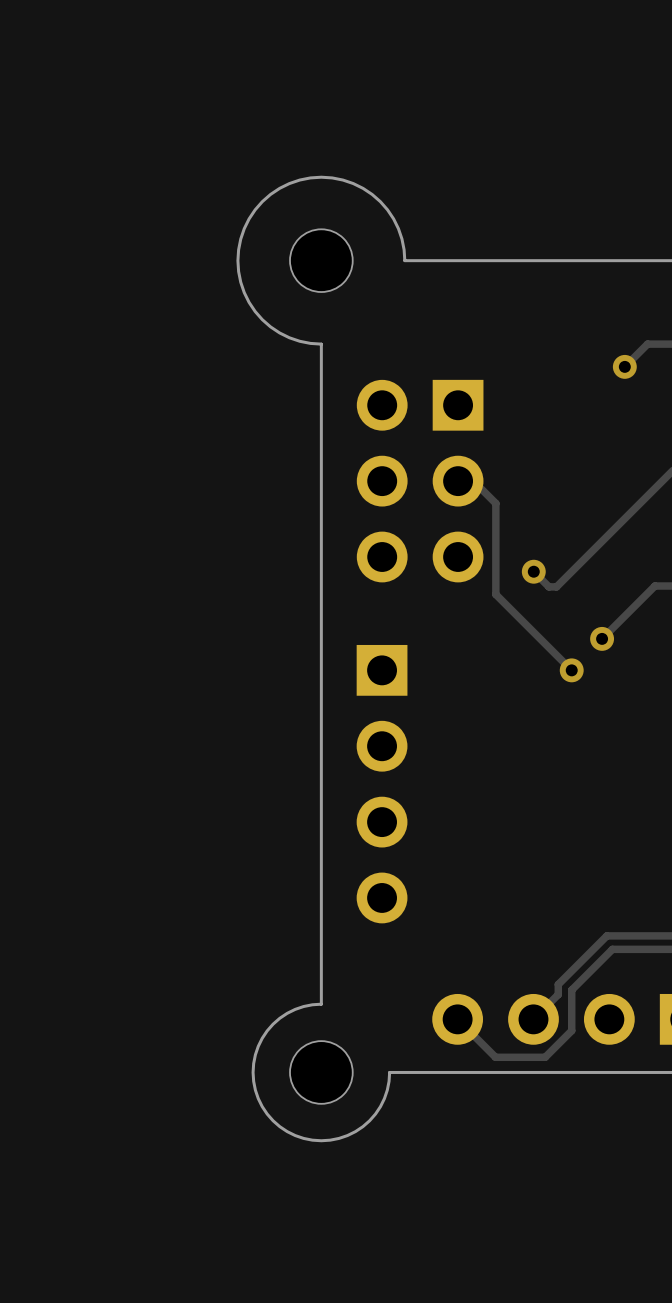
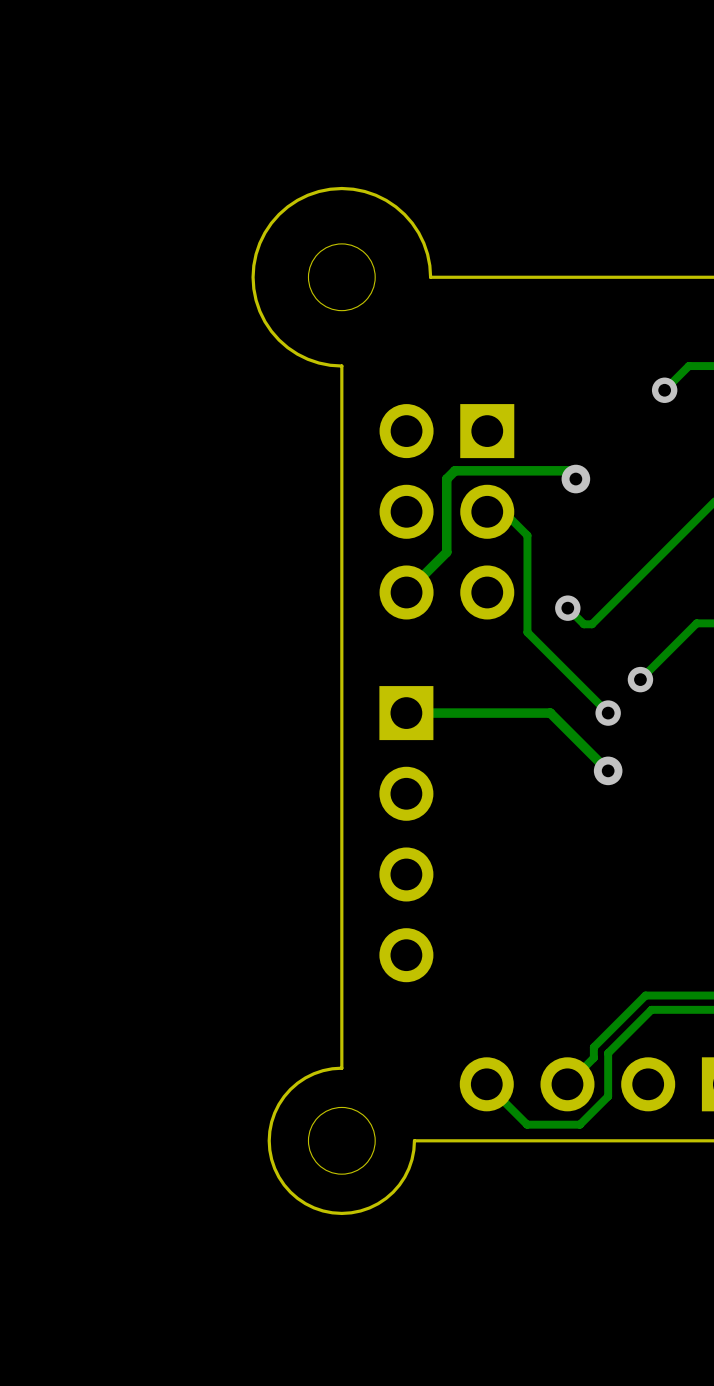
track: none -> (575, 479) (567, 470) (454, 470) (446, 479) (446, 552) (406, 592)
via: none -> (575, 479)
track: none -> (406, 713) (550, 713) (608, 770)
via: none -> (608, 770)

